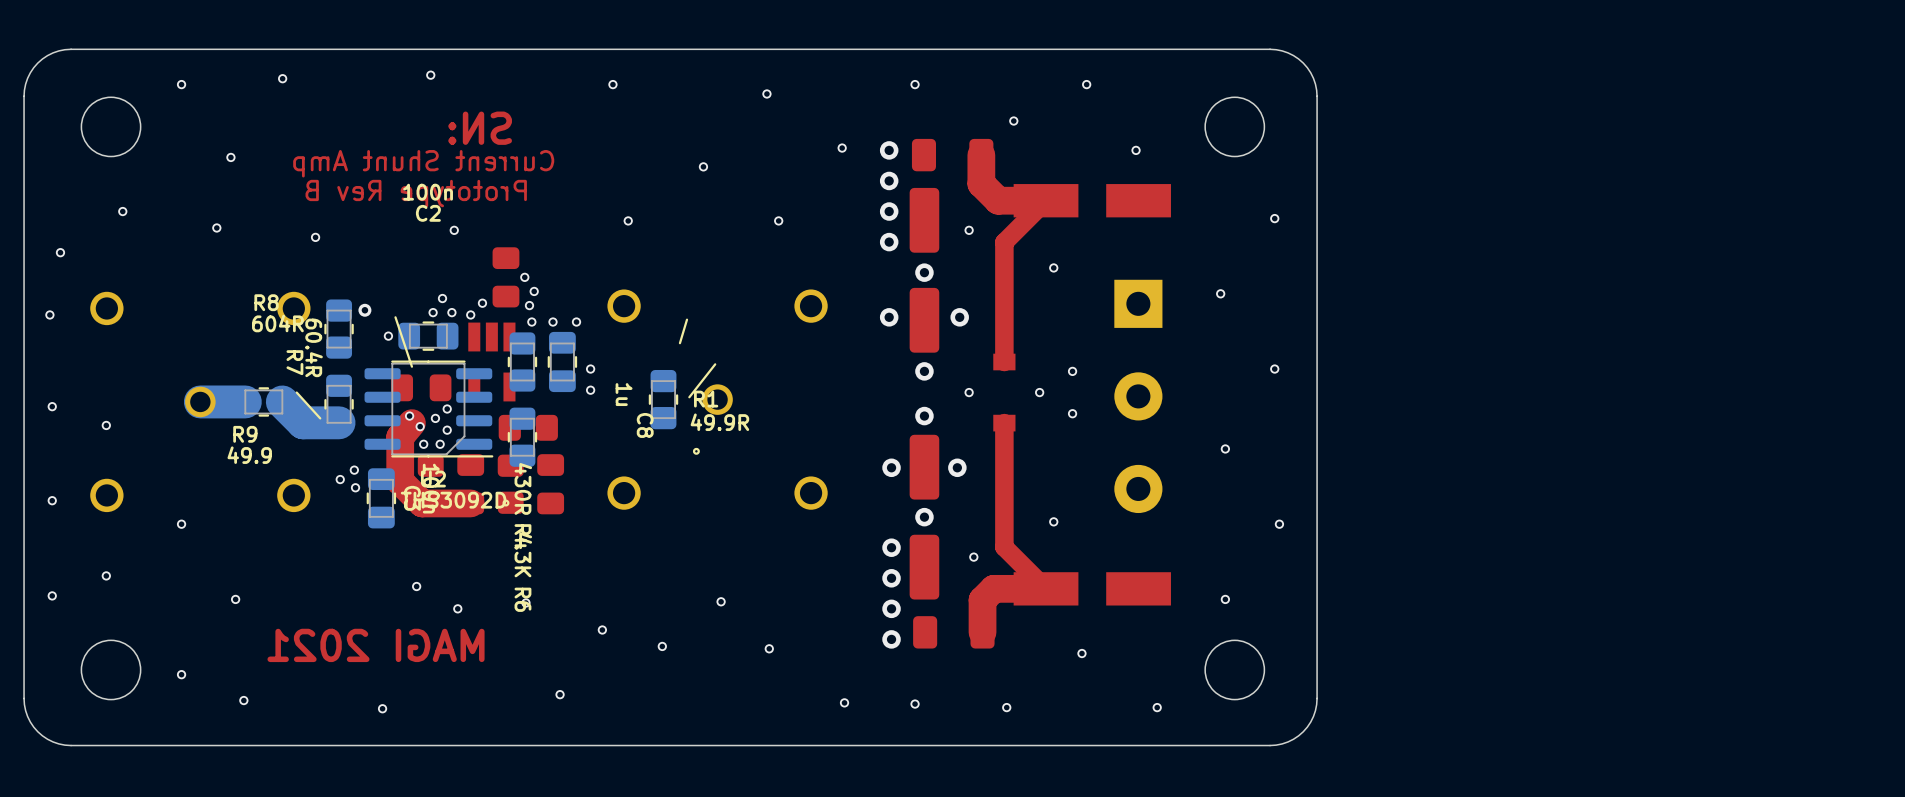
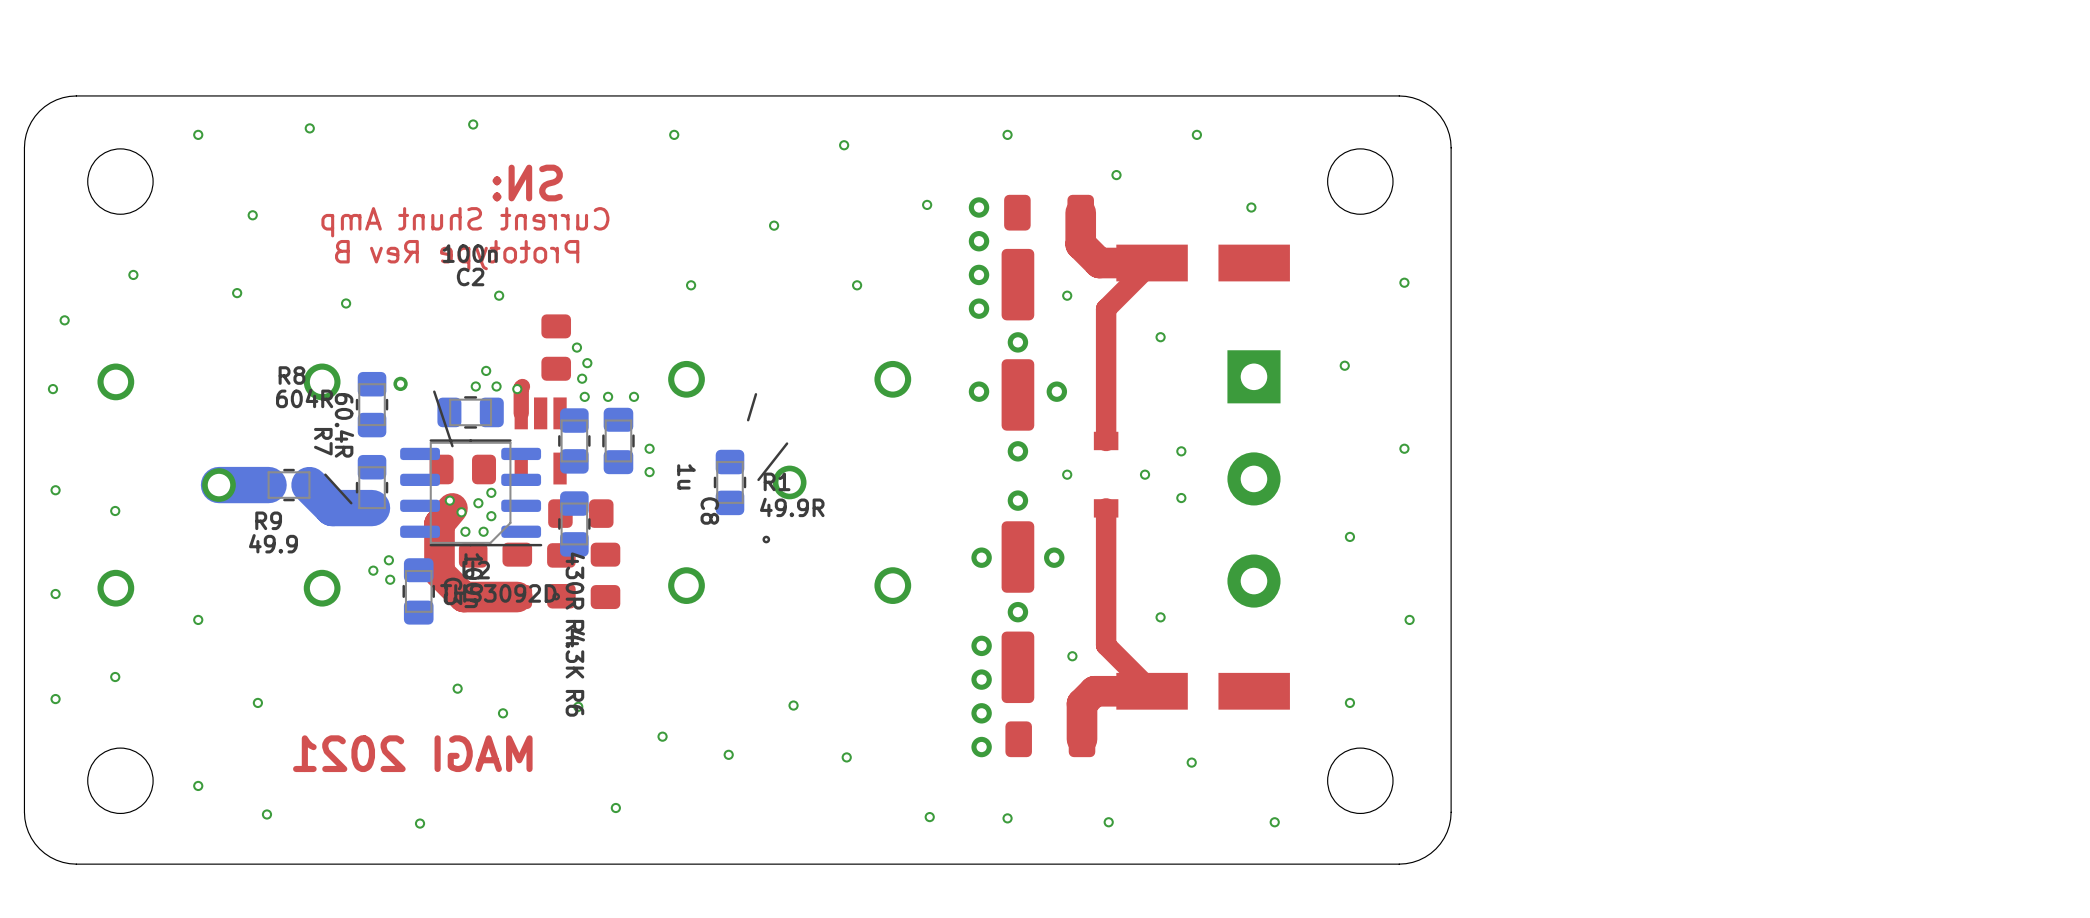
via: (482, 303) -> none
top track: none -> (522, 386) (521, 413)
via: (388, 336) -> none

